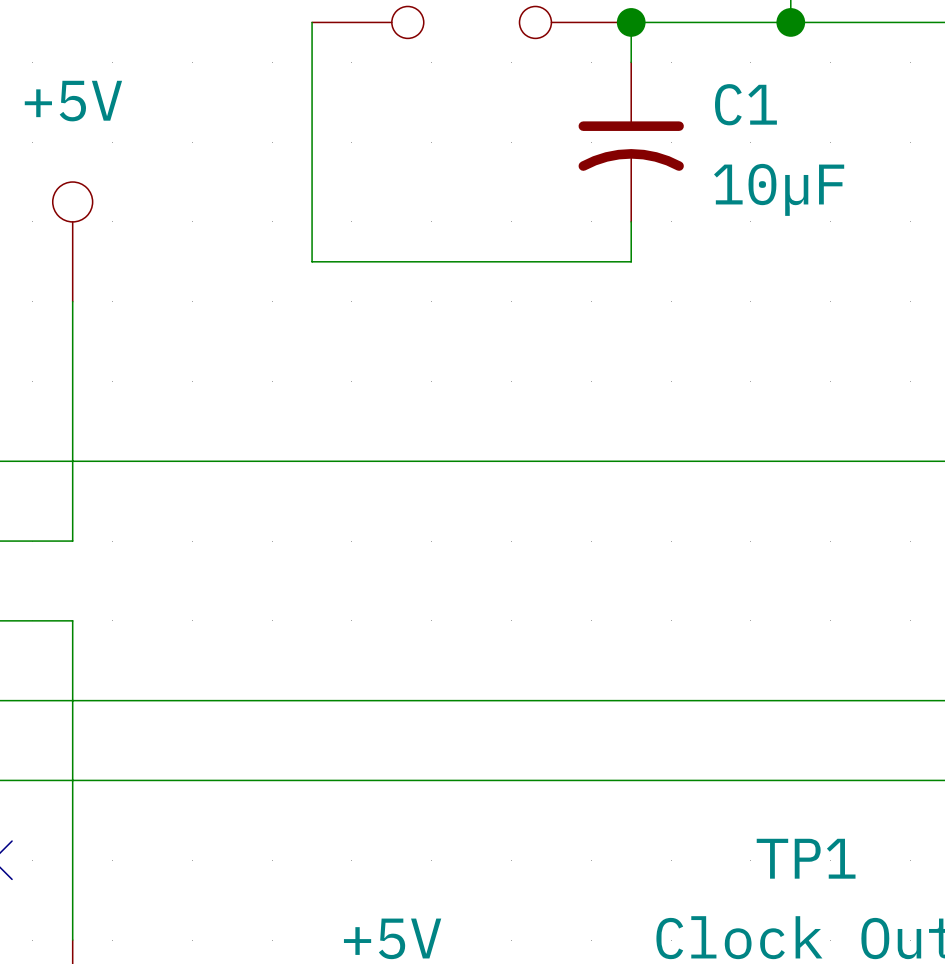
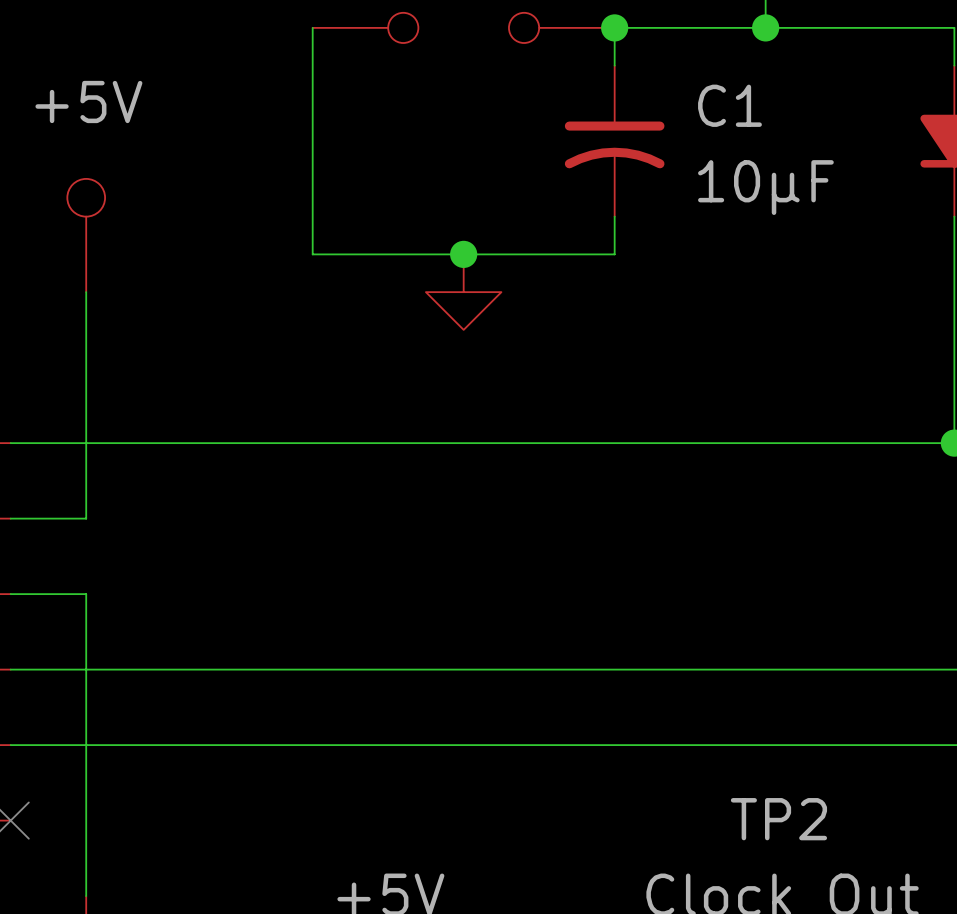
junction: none -> (463, 254)
power symbol: none -> (463, 292)
TP1 name: TP1 (806, 858) -> TP2 (778, 819)

